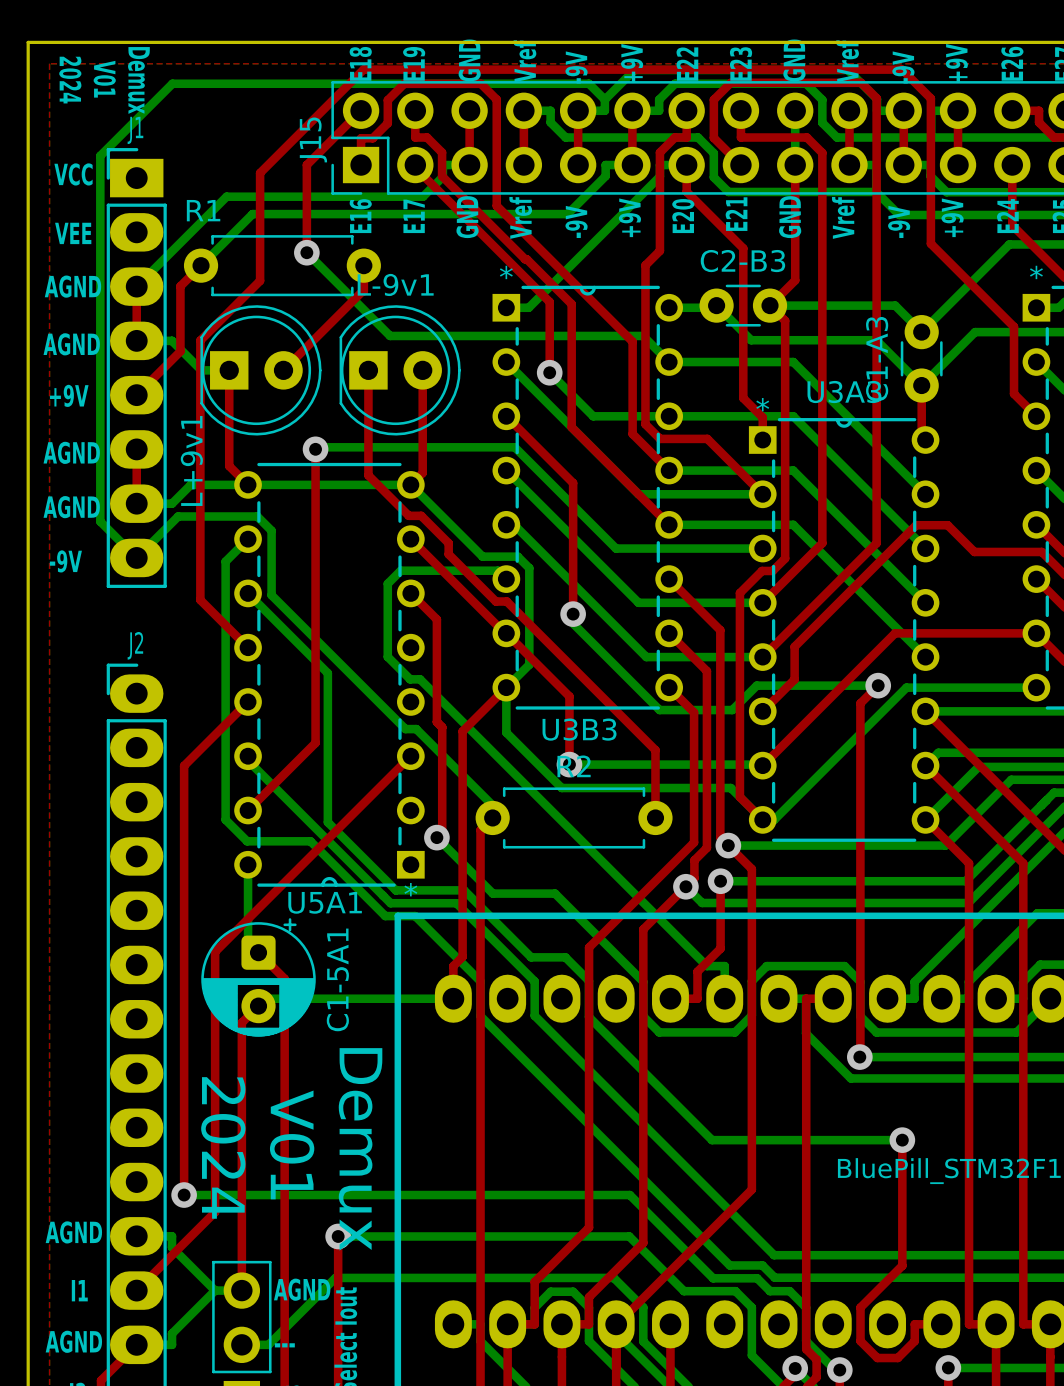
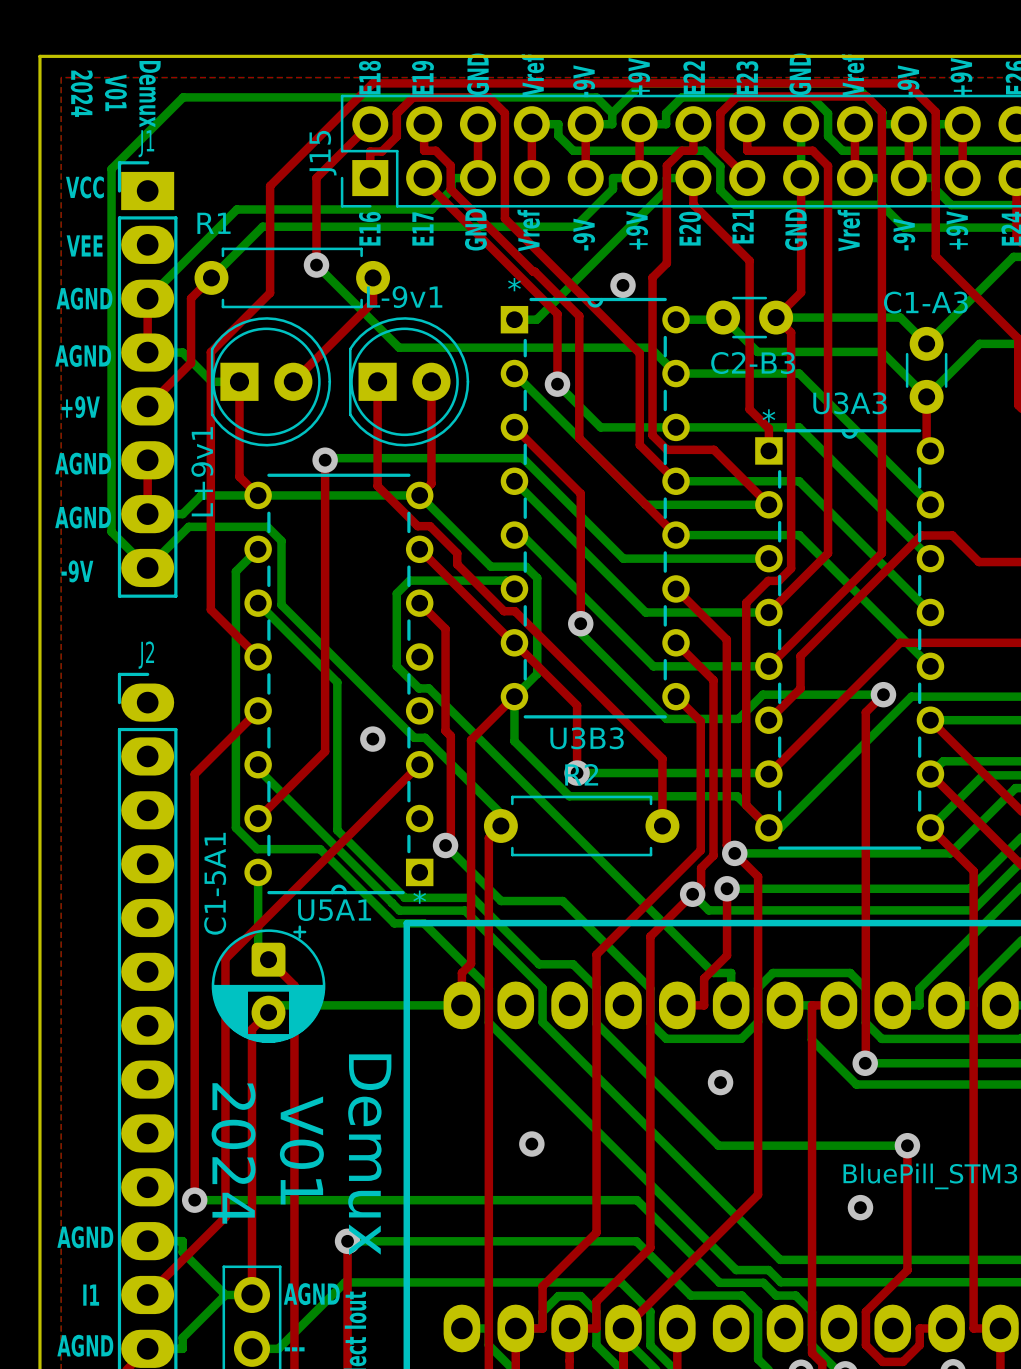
C2-B3 name position: C2-B3 (742, 261) -> C2-B3 (753, 363)
via: none -> (623, 285)
C1-A3 name rotation: 0° (877, 359) -> 90° clockwise (925, 302)
via: none -> (372, 739)
C1-5A1 name position: C1-5A1 (337, 979) -> C1-5A1 (215, 883)
via: none -> (720, 1082)
via: none -> (531, 1144)
via: none -> (860, 1207)

